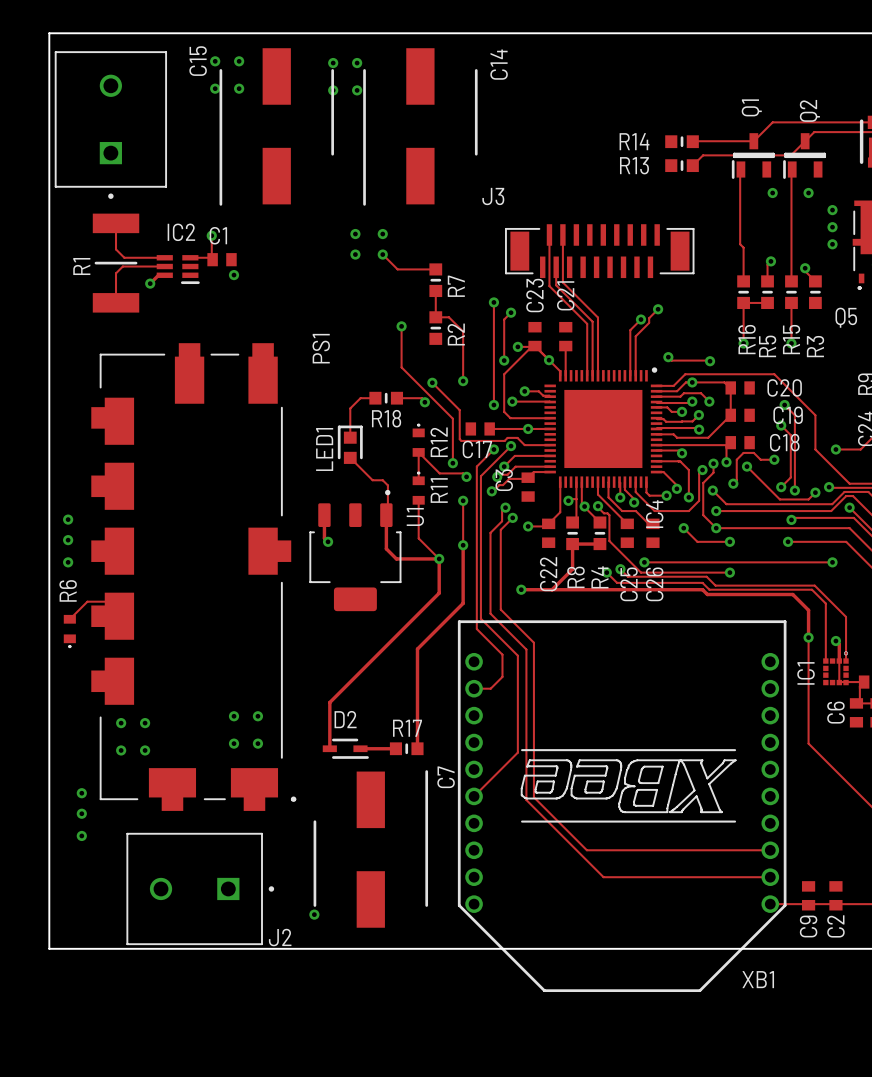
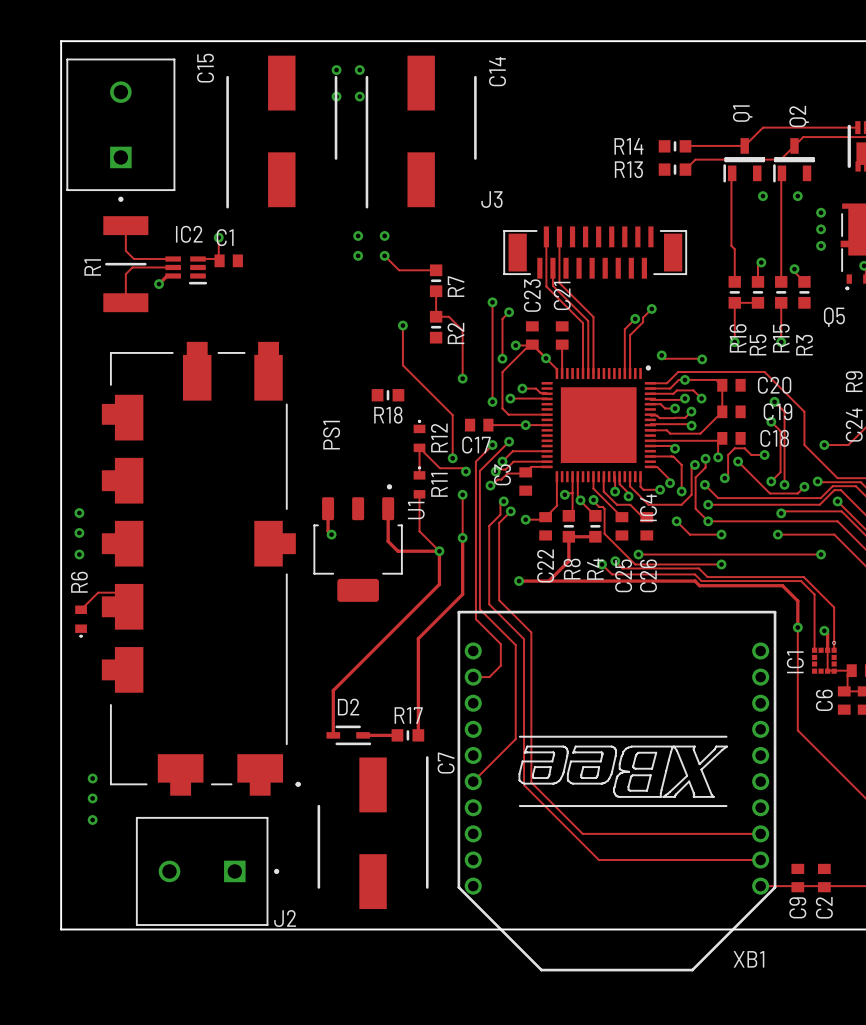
via: (215, 61) -> none
via: (239, 61) -> none
via: (215, 88) -> none
via: (239, 88) -> none
via: (234, 275) -> none
PS1 name position: PS1 (321, 348) -> PS1 (331, 435)
track: (432, 382) (459, 410) (459, 439) (461, 440) (504, 440) (507, 437) (517, 437) (524, 445) (550, 445) -> none
via: (432, 382) -> none
track: (375, 398) (360, 398) (350, 408) (350, 437) -> none
track: (396, 398) (422, 398) (424, 402) -> none
via: (424, 402) -> none
LED1: (350, 444) -> none
track: (350, 457) (372, 480) (382, 480) (387, 485) (386, 515) -> none
via: (234, 716) -> none
via: (257, 716) -> none
via: (121, 723) -> none
via: (145, 723) -> none
via: (234, 743) -> none
via: (257, 743) -> none
via: (121, 750) -> none
via: (145, 750) -> none
via: (314, 914) -> none

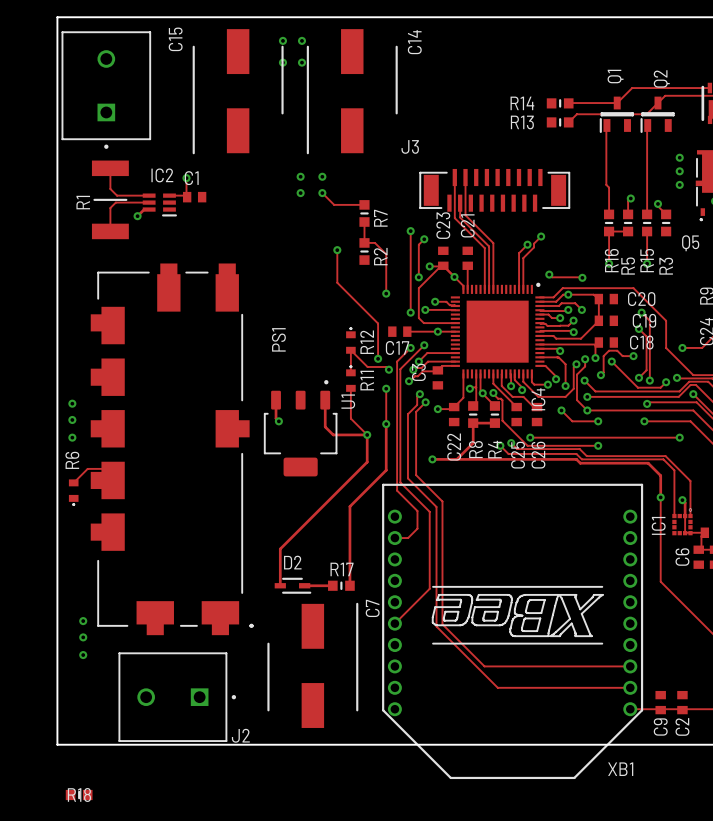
via: (762, 196) -> none
via: (797, 196) -> none
R18 position: (387, 395) -> (79, 795)
R18 name position: R18 (388, 415) -> R18 (79, 794)

